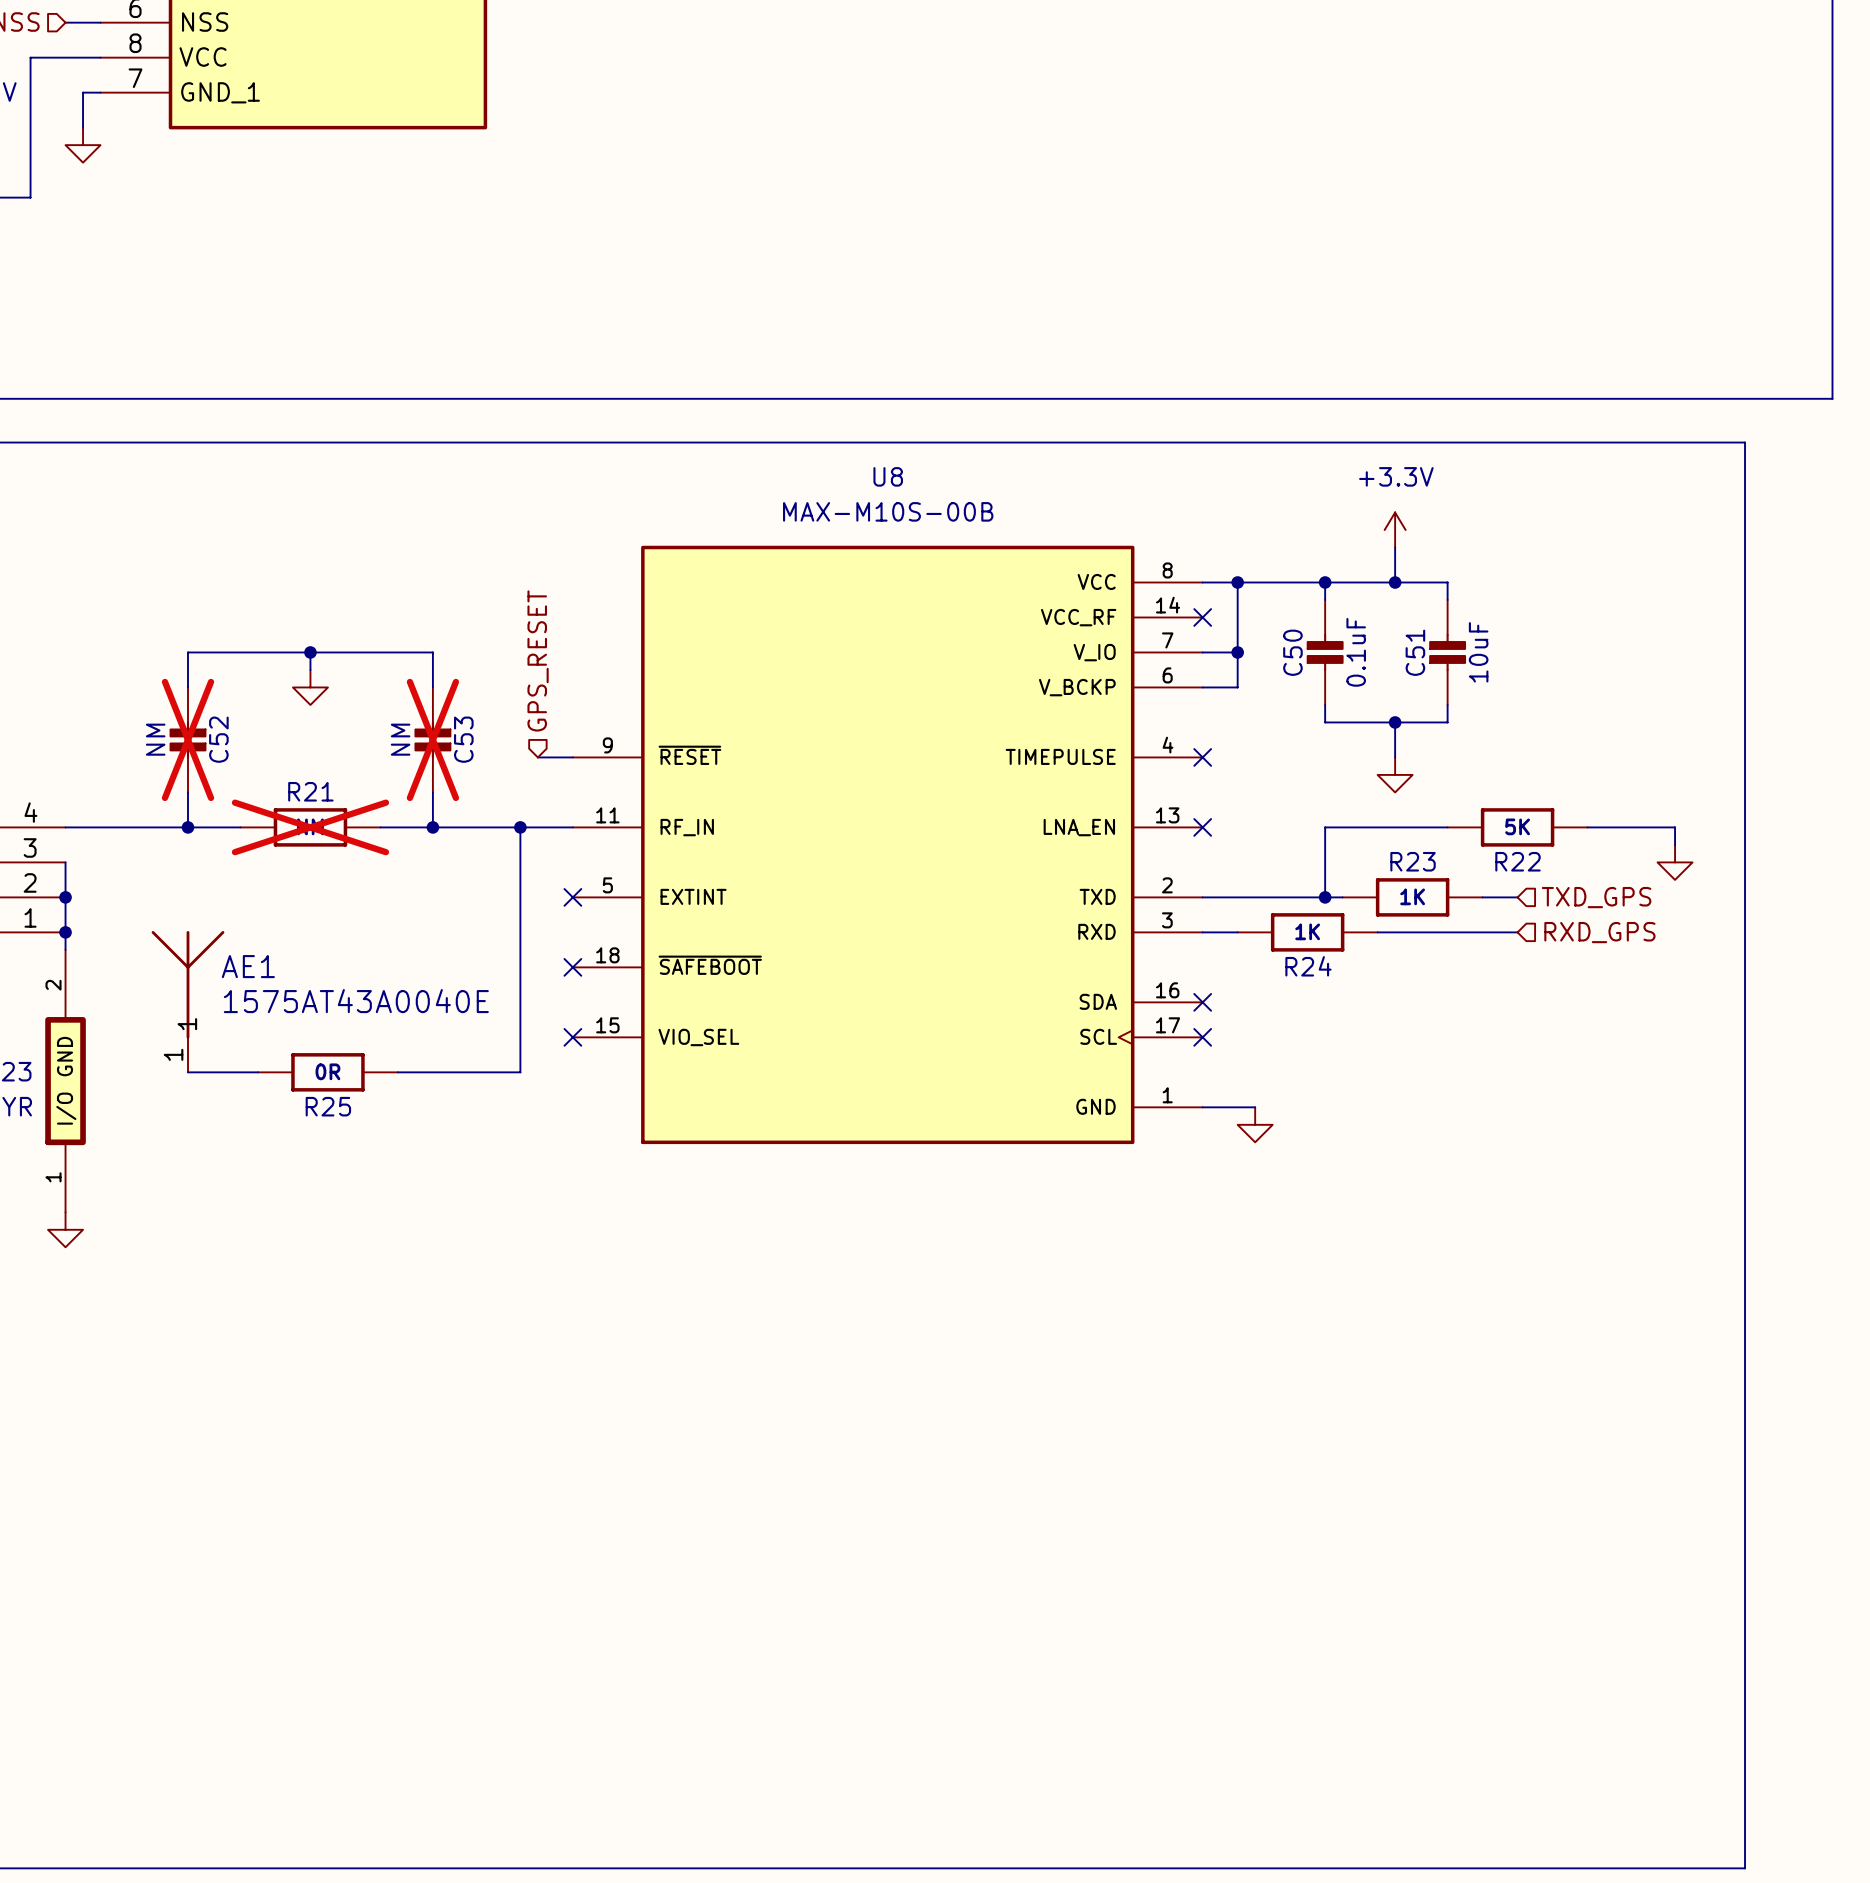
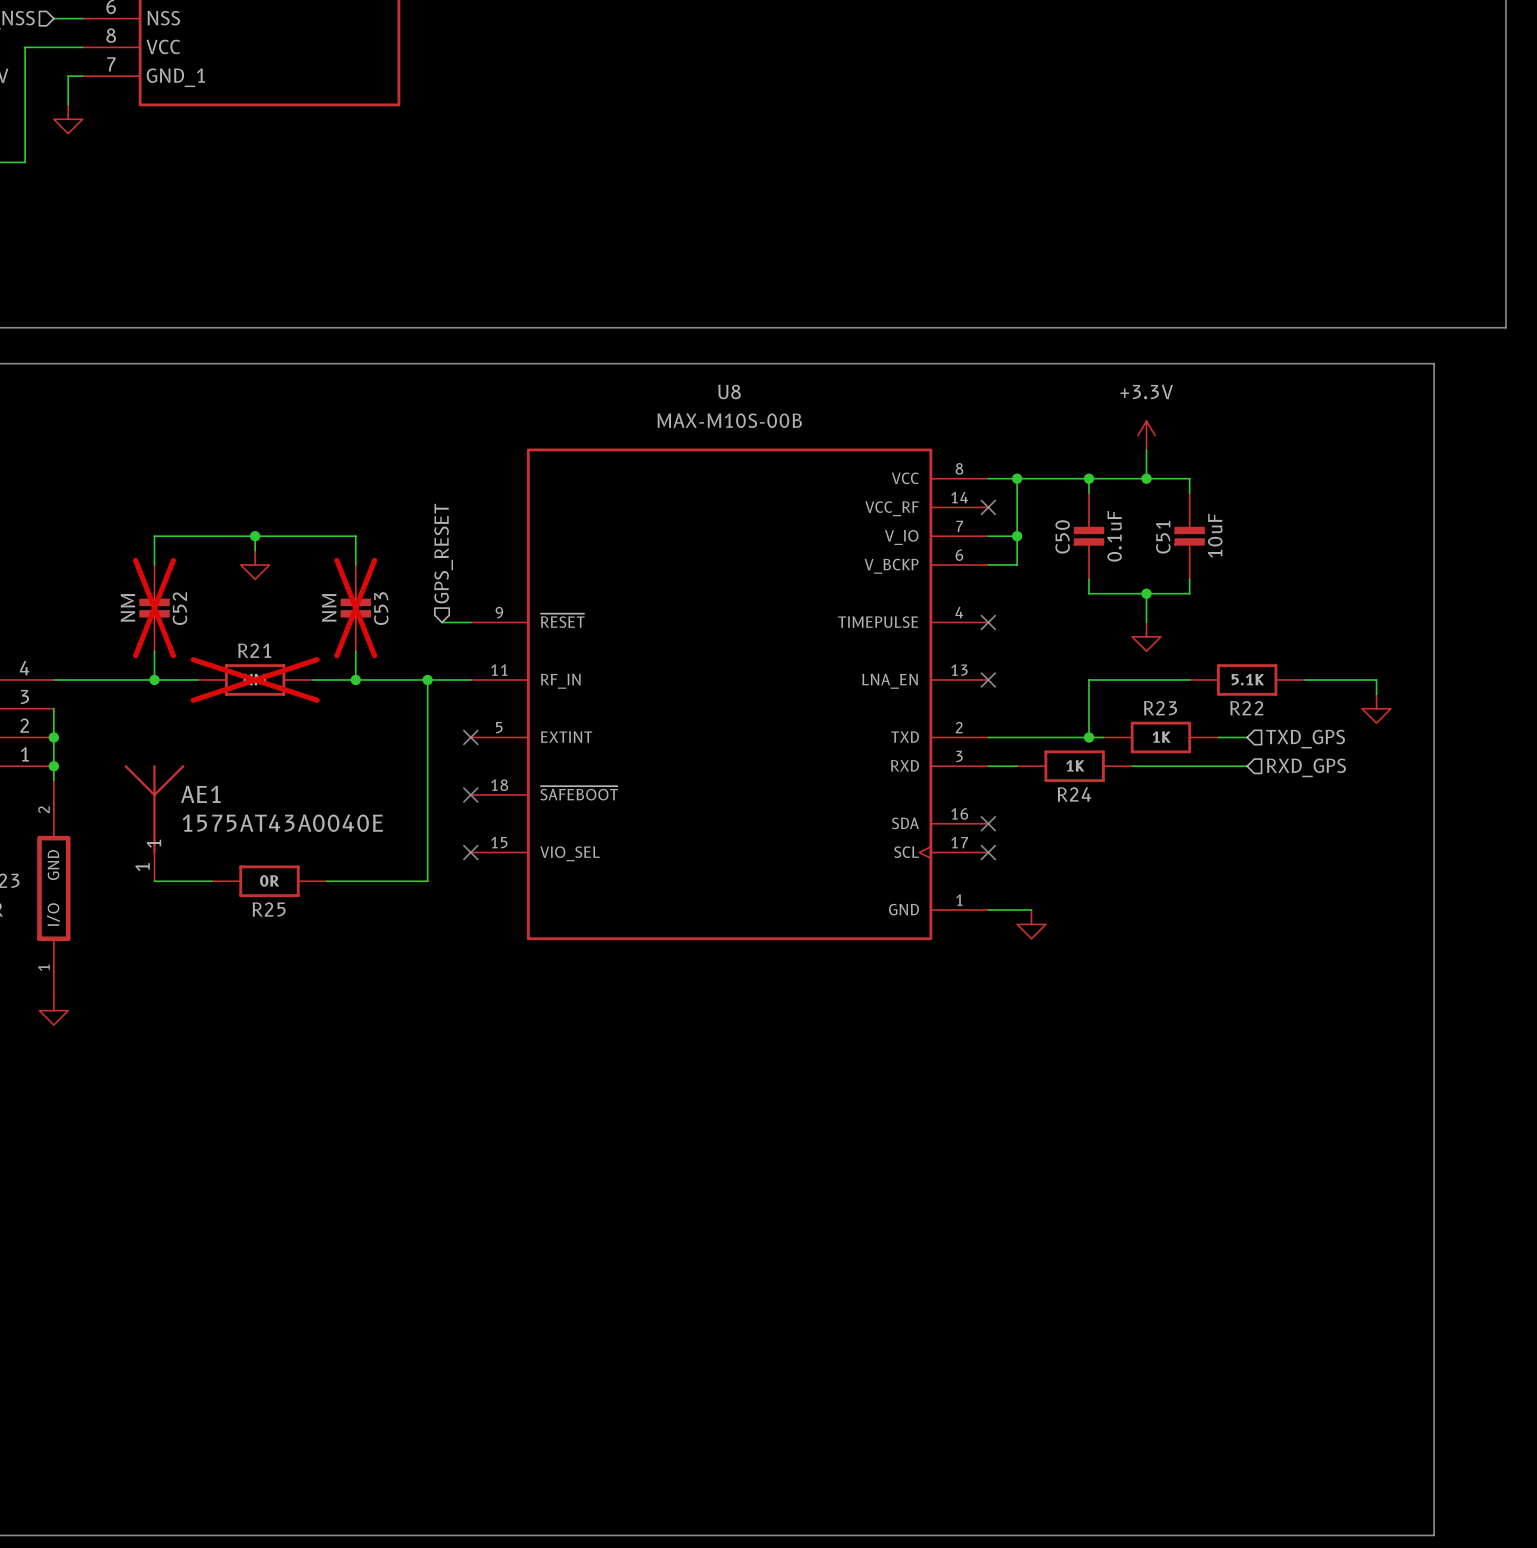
R22 value: 5K (1517, 826) -> 5.1K (1247, 679)

